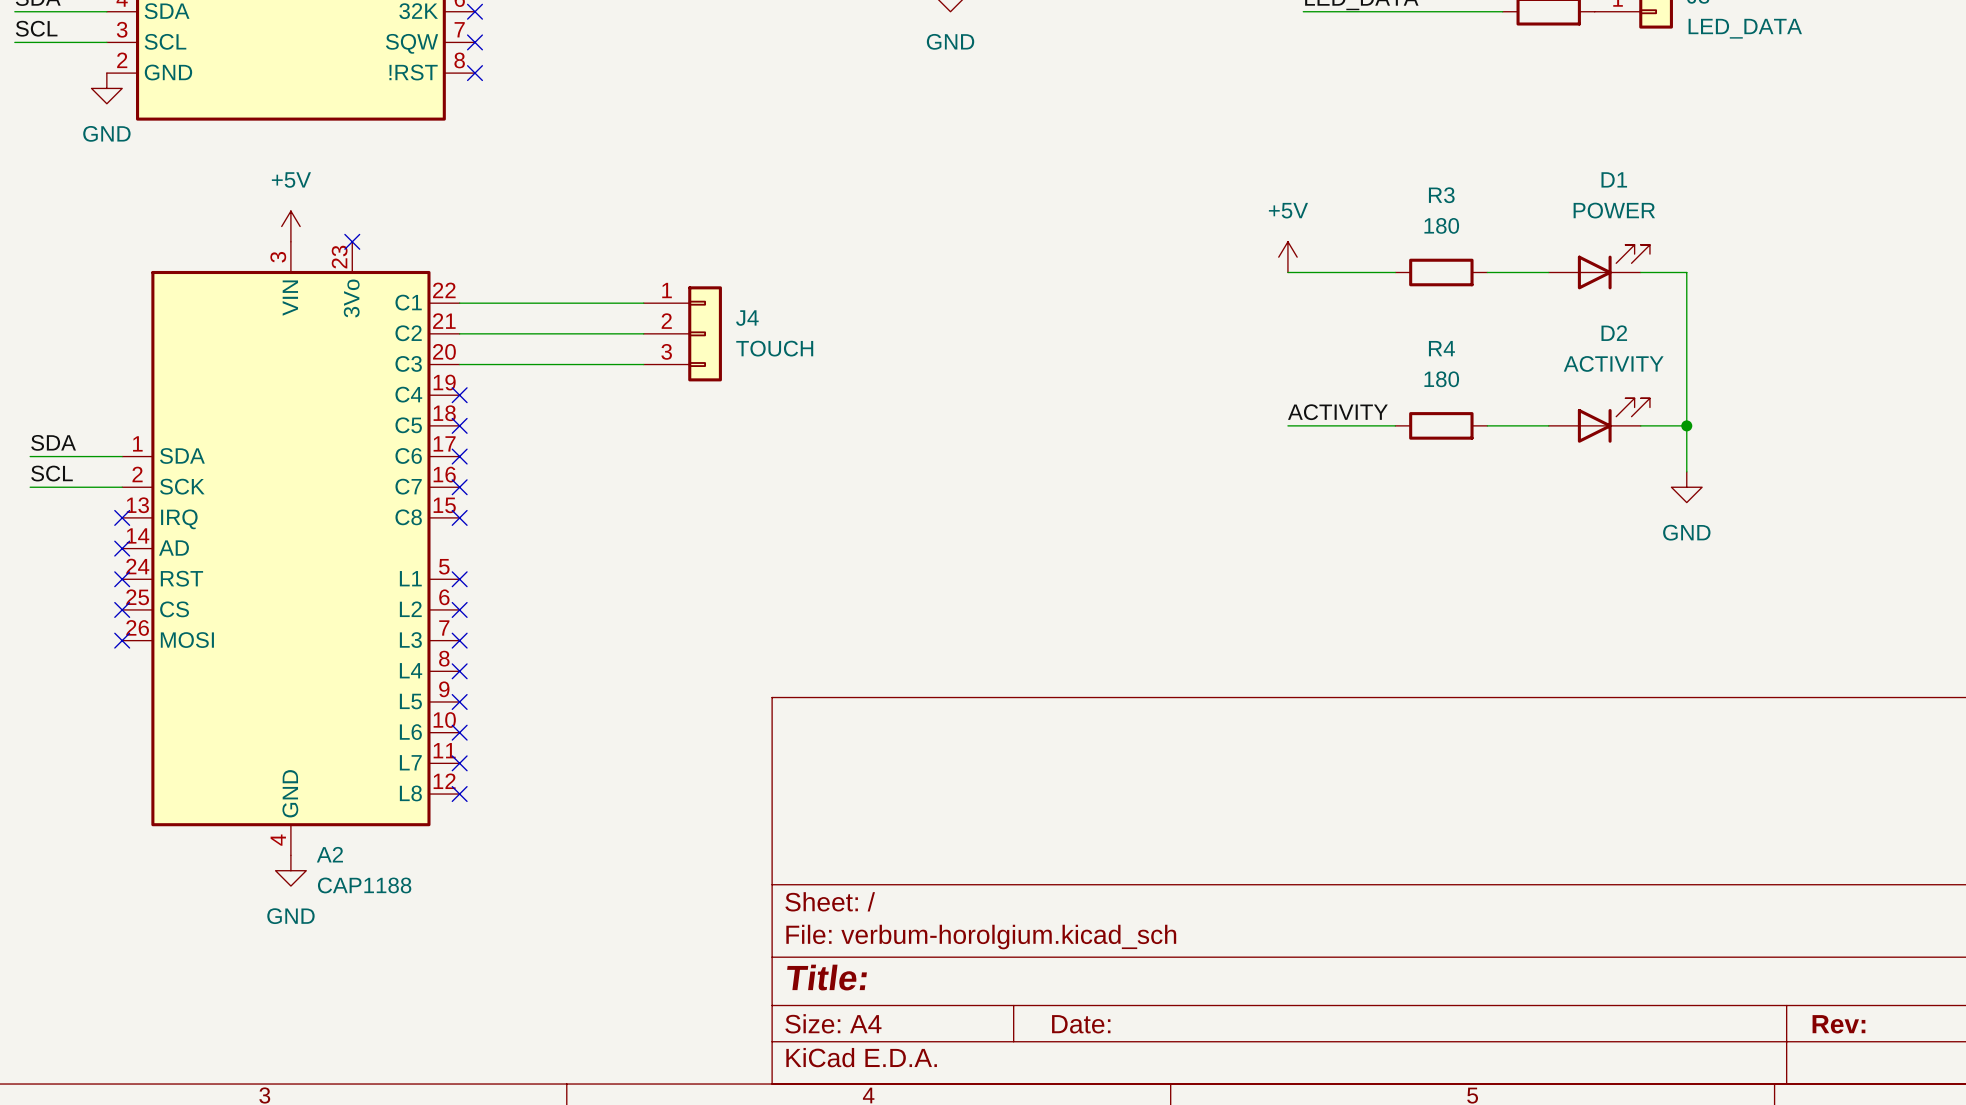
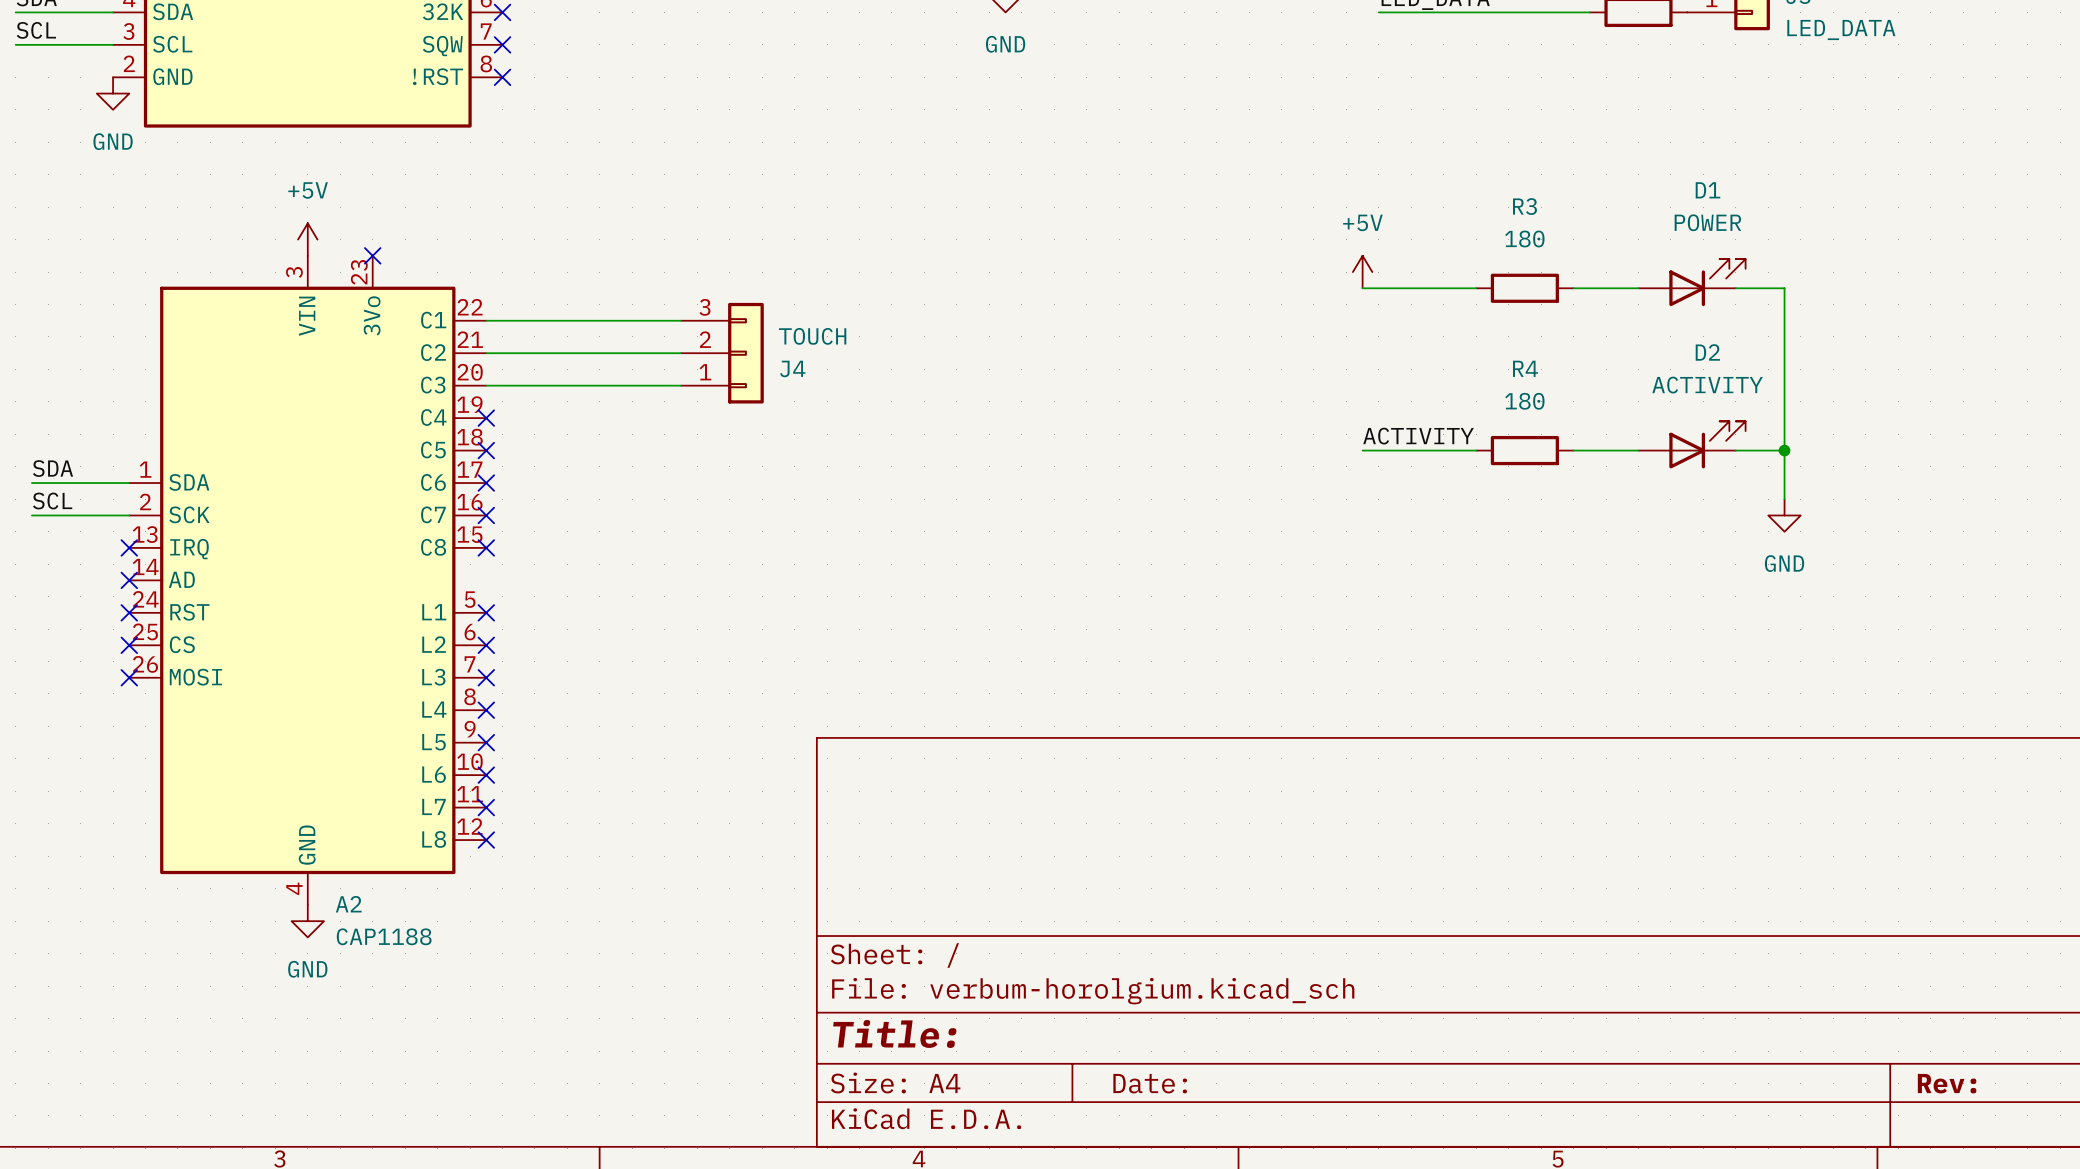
J4 flip: as is (705, 333) -> up-down (745, 353)

